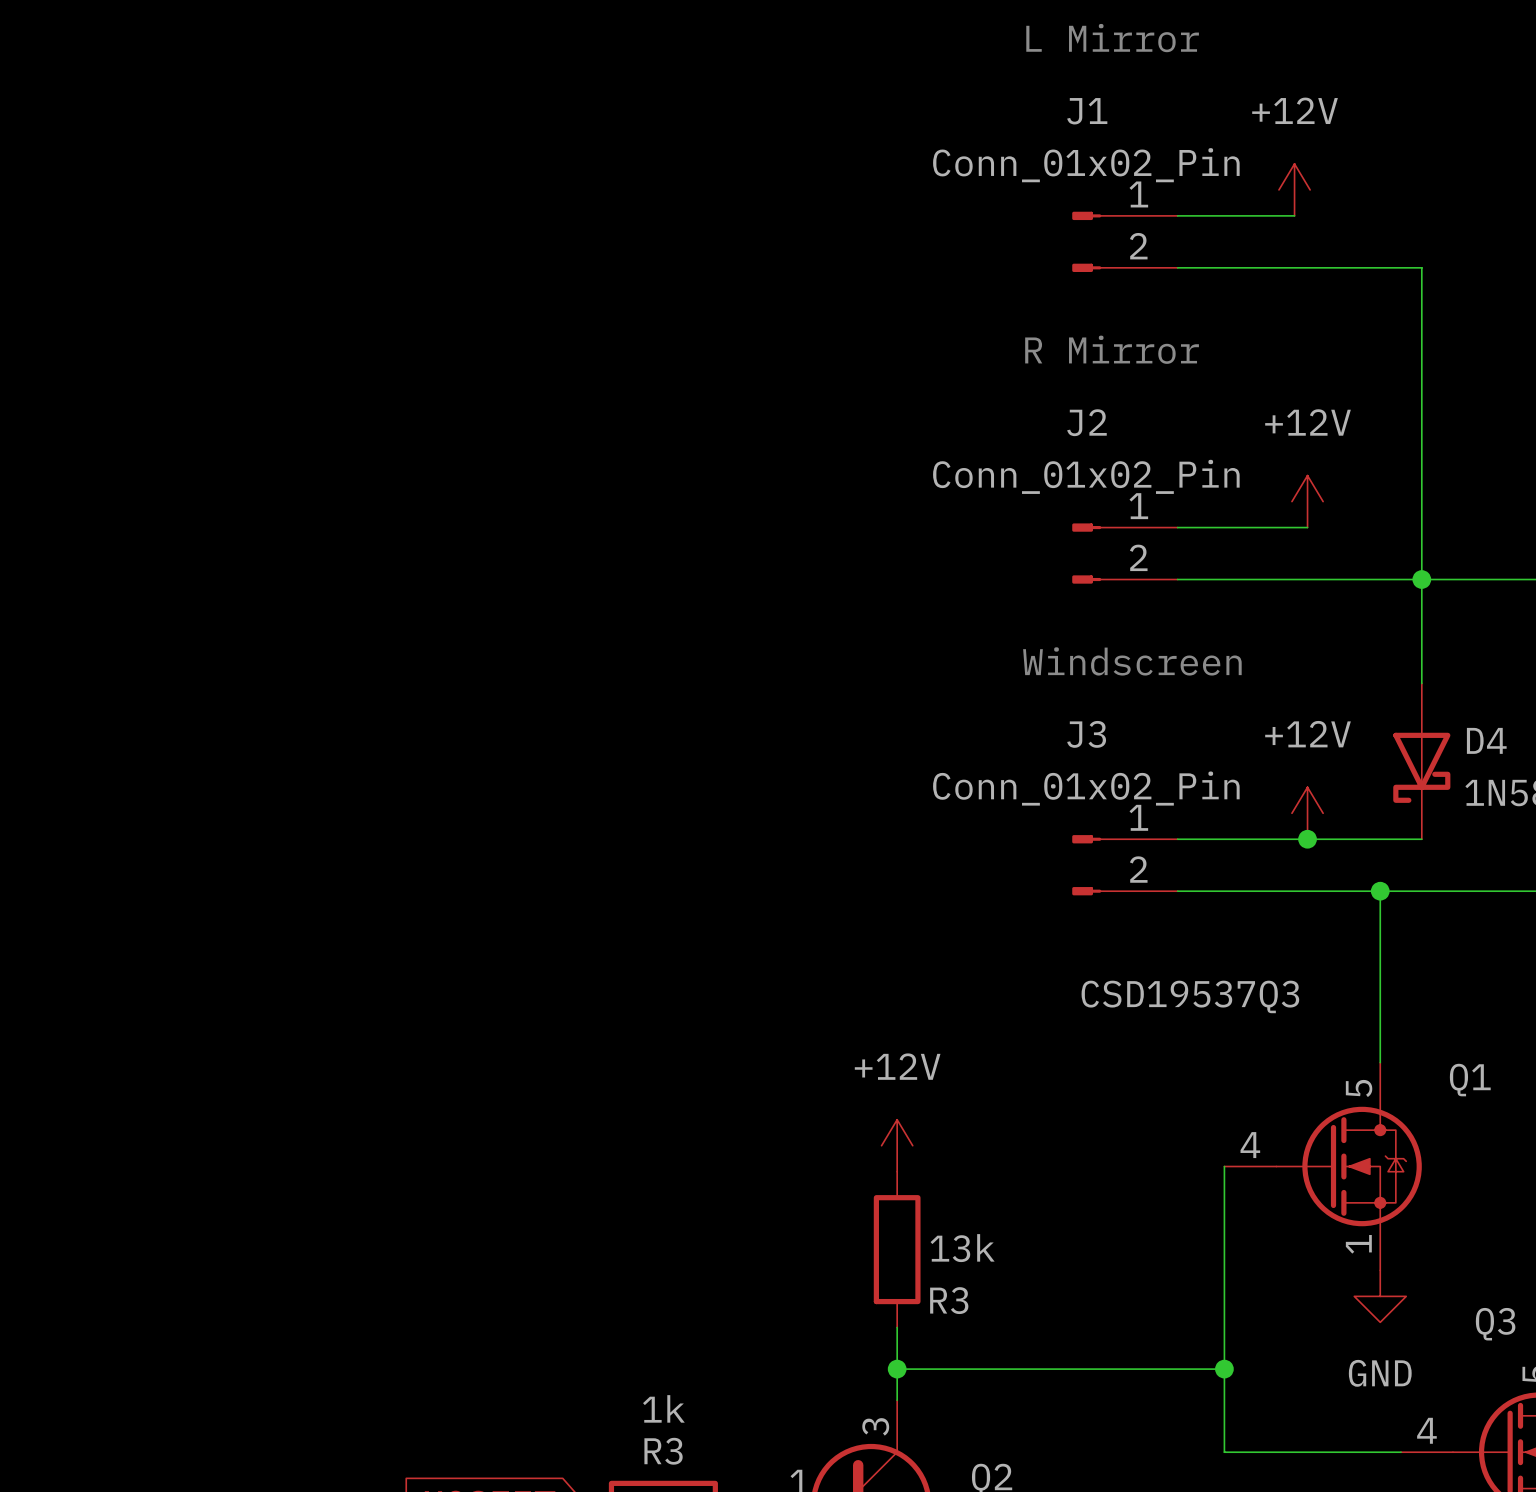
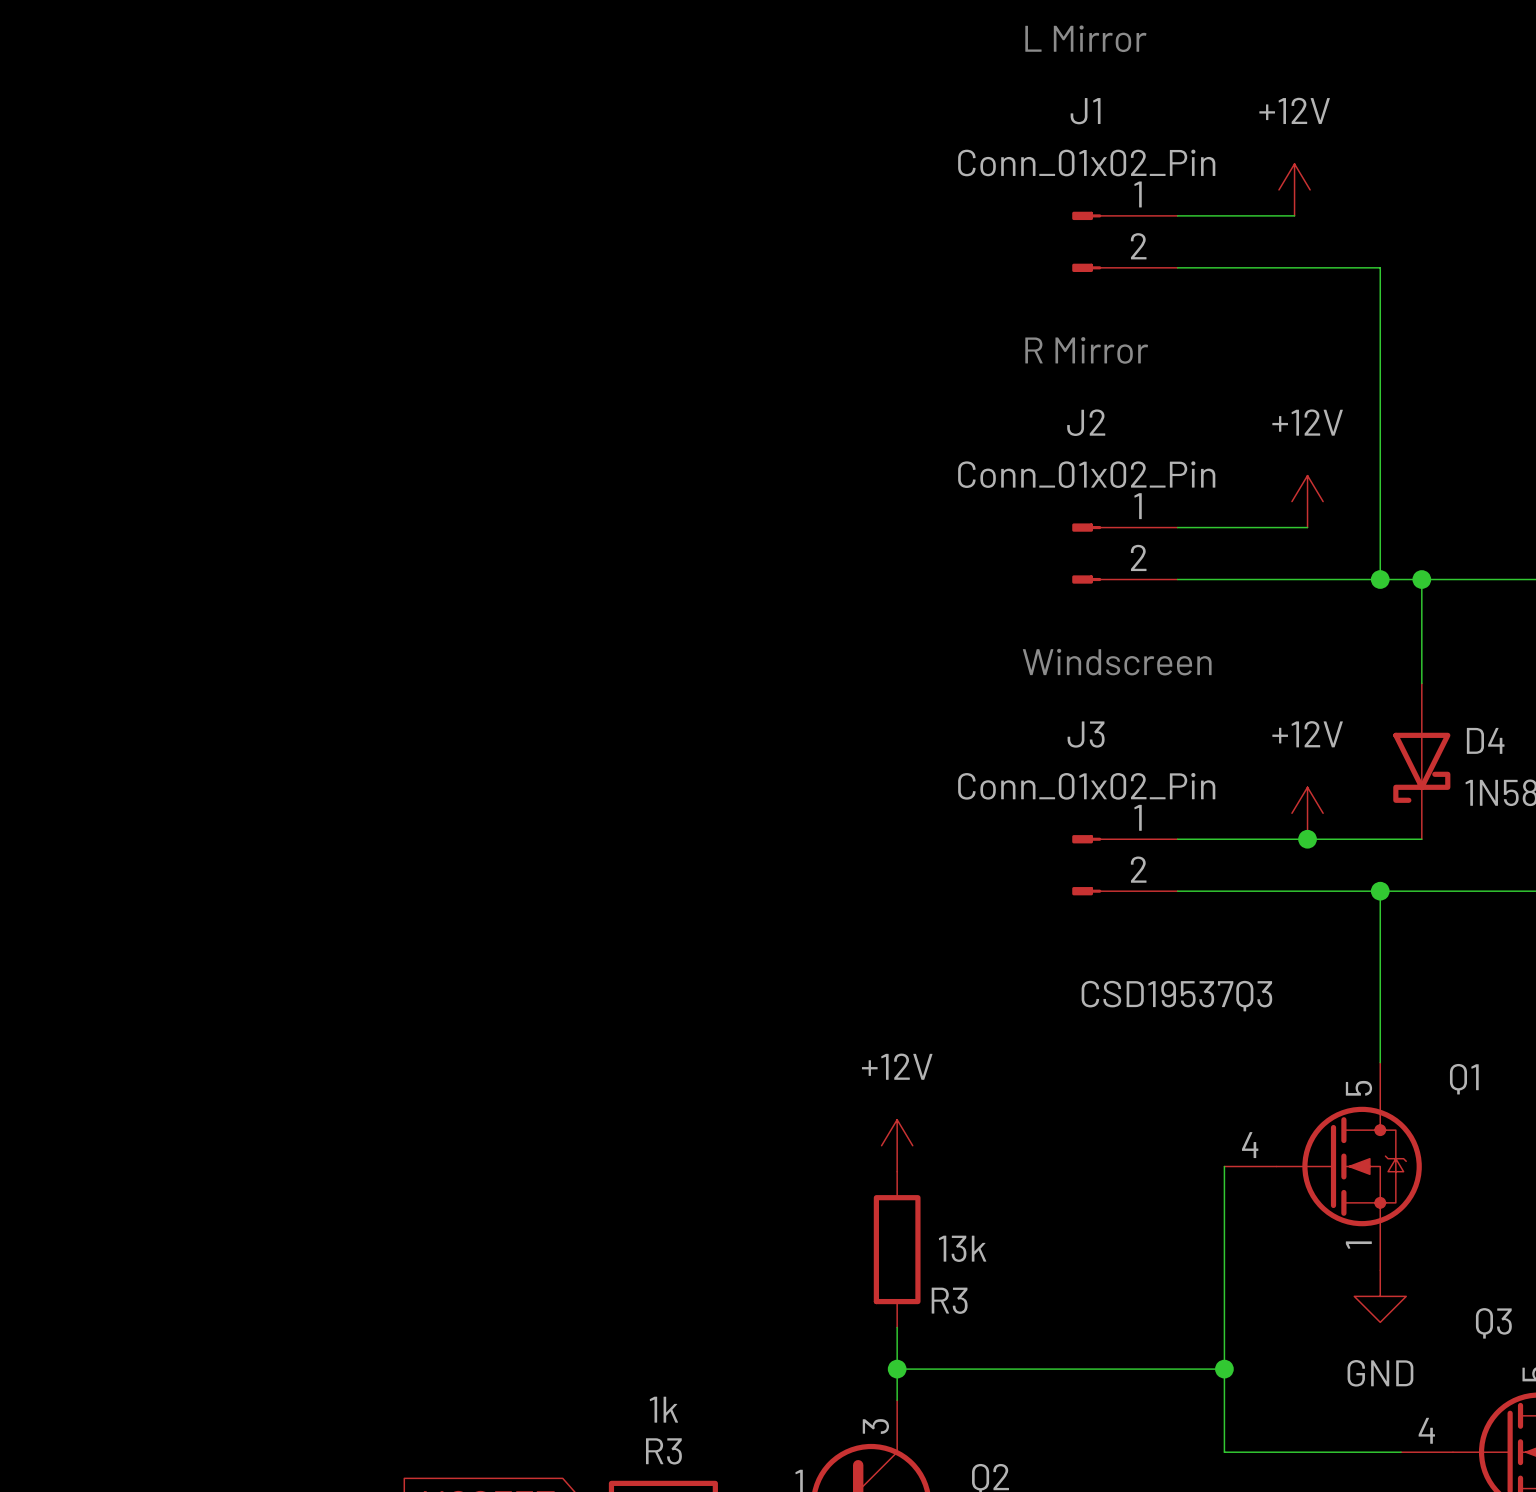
wire: (1380, 267) (1421, 267) (1421, 579) -> (1380, 267) (1380, 579)
junction: none -> (1380, 579)

